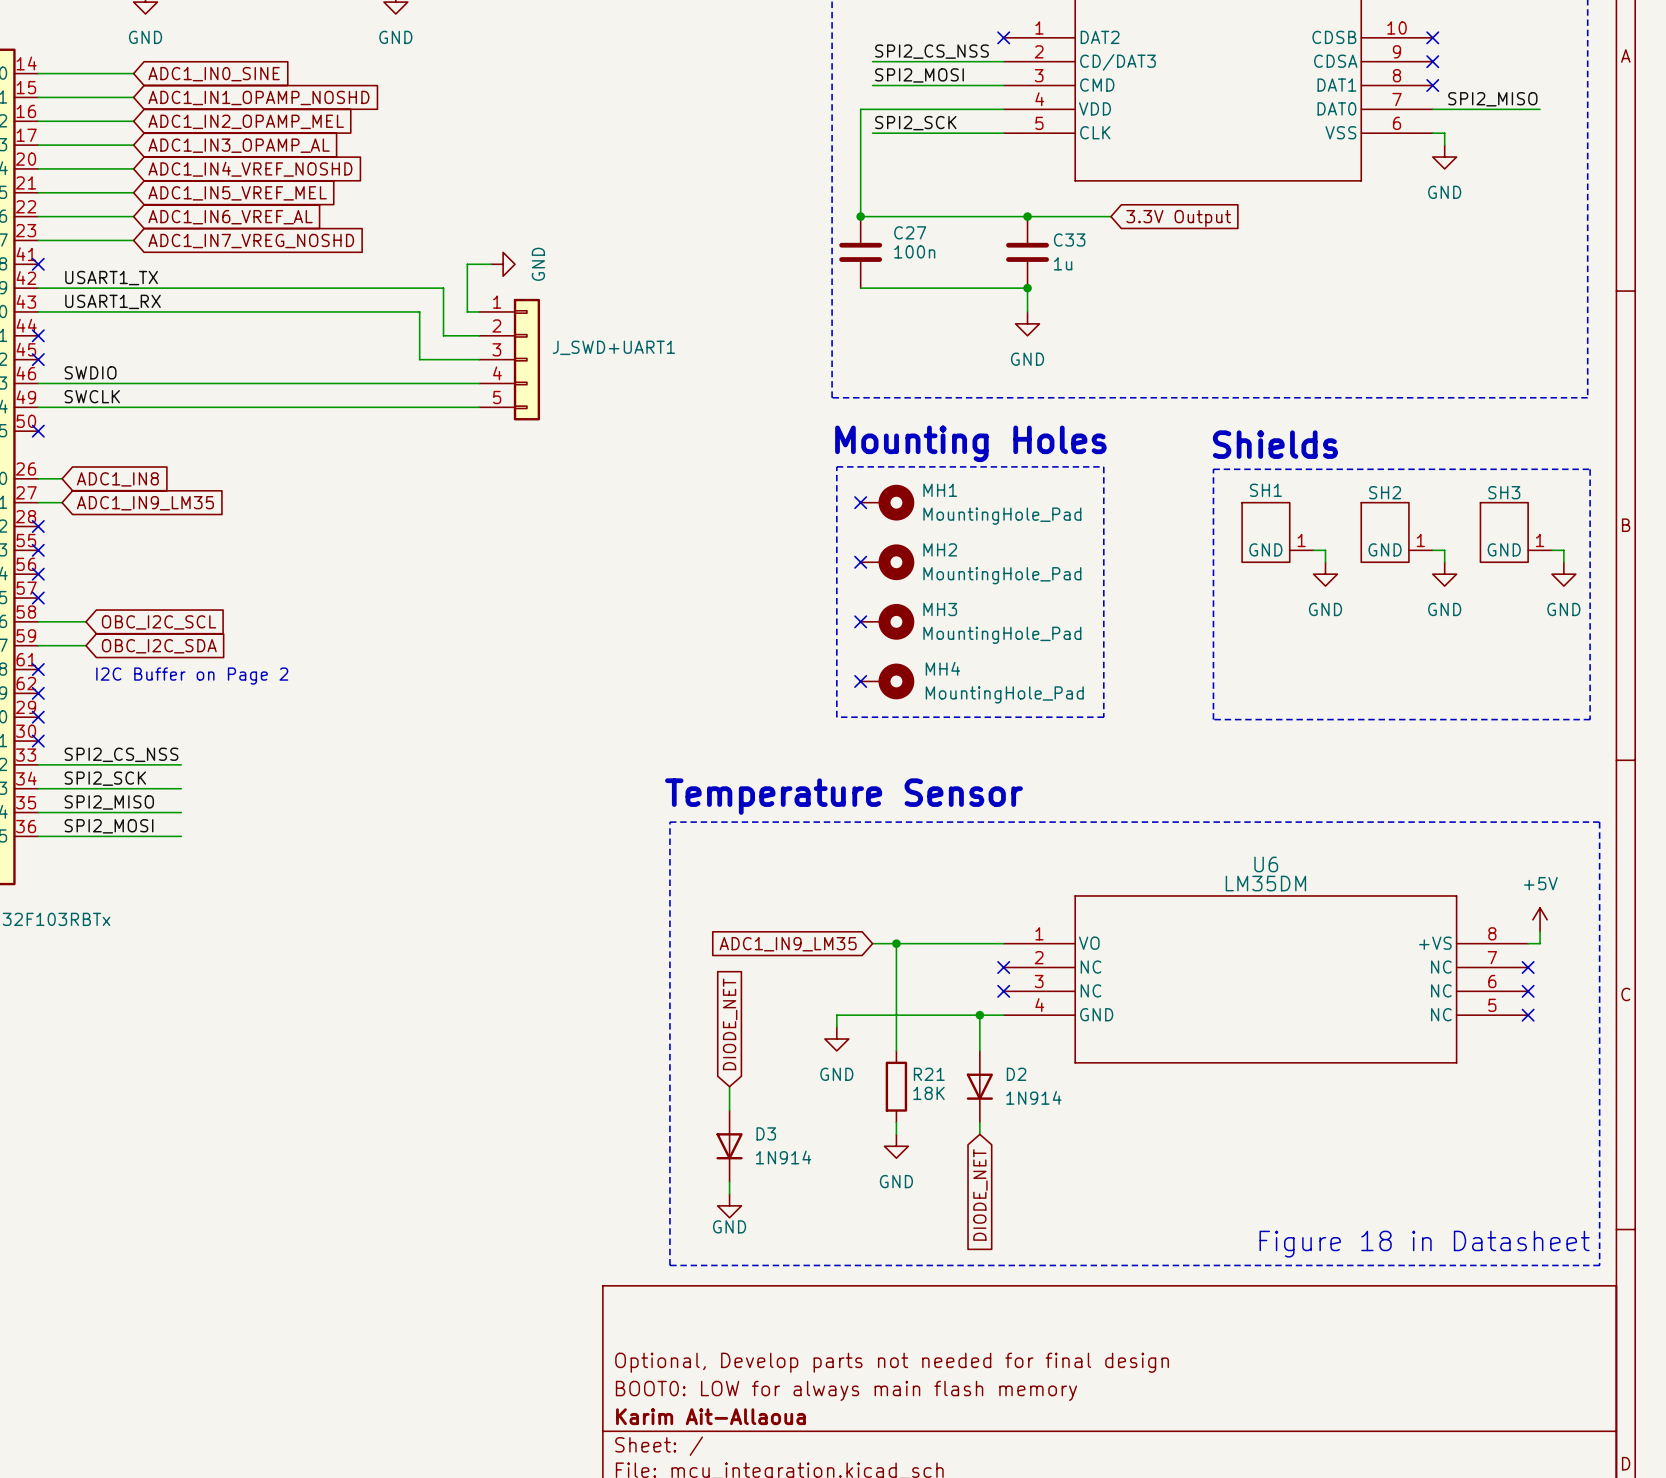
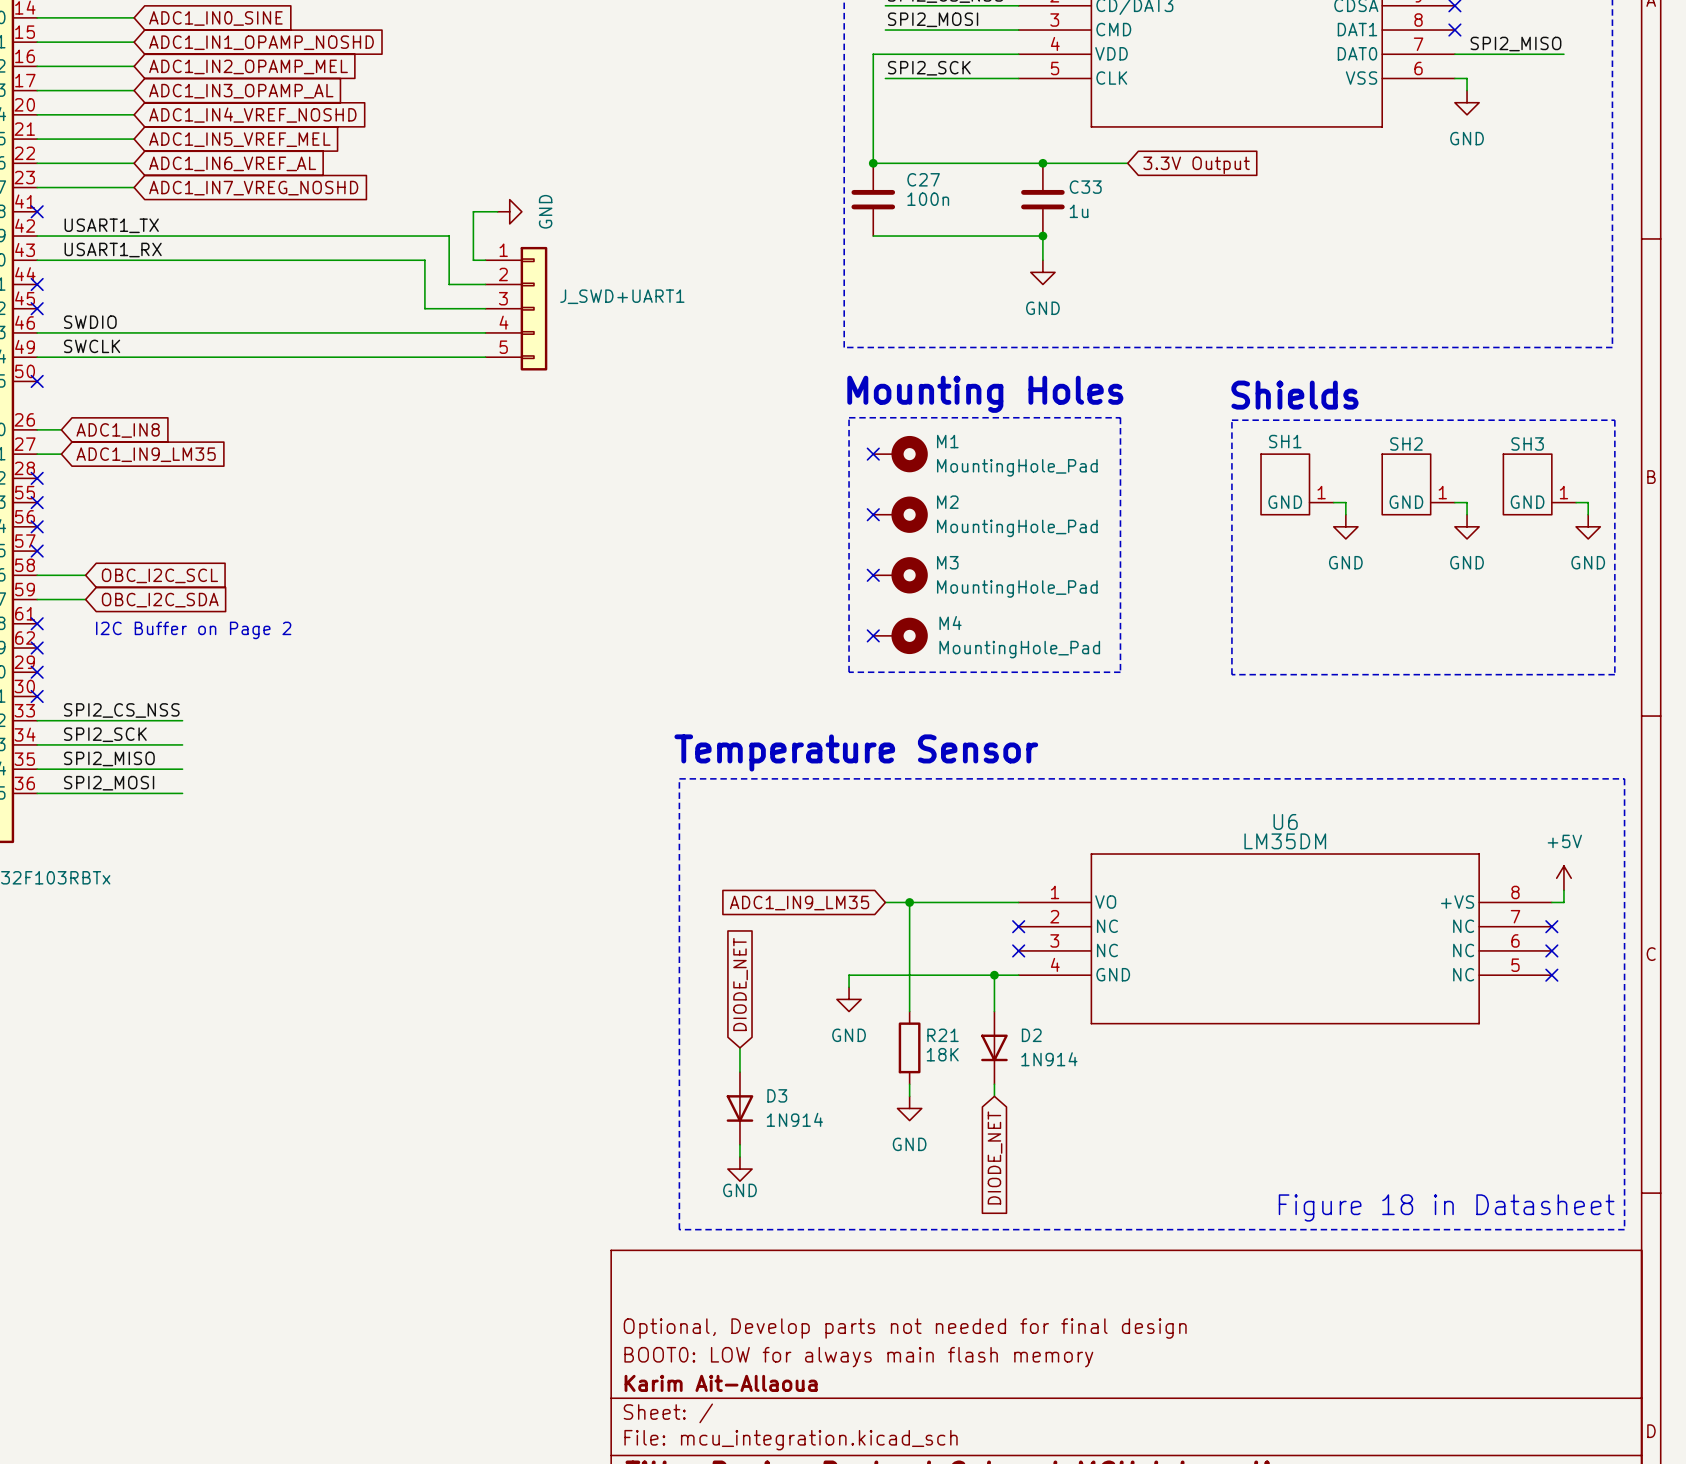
MH1 name: MH1 (940, 490) -> M1 (947, 441)
MH2 name: MH2 (940, 549) -> M2 (947, 502)
MH3 name: MH3 (940, 609) -> M3 (947, 562)
MH4 name: MH4 (942, 668) -> M4 (950, 623)

